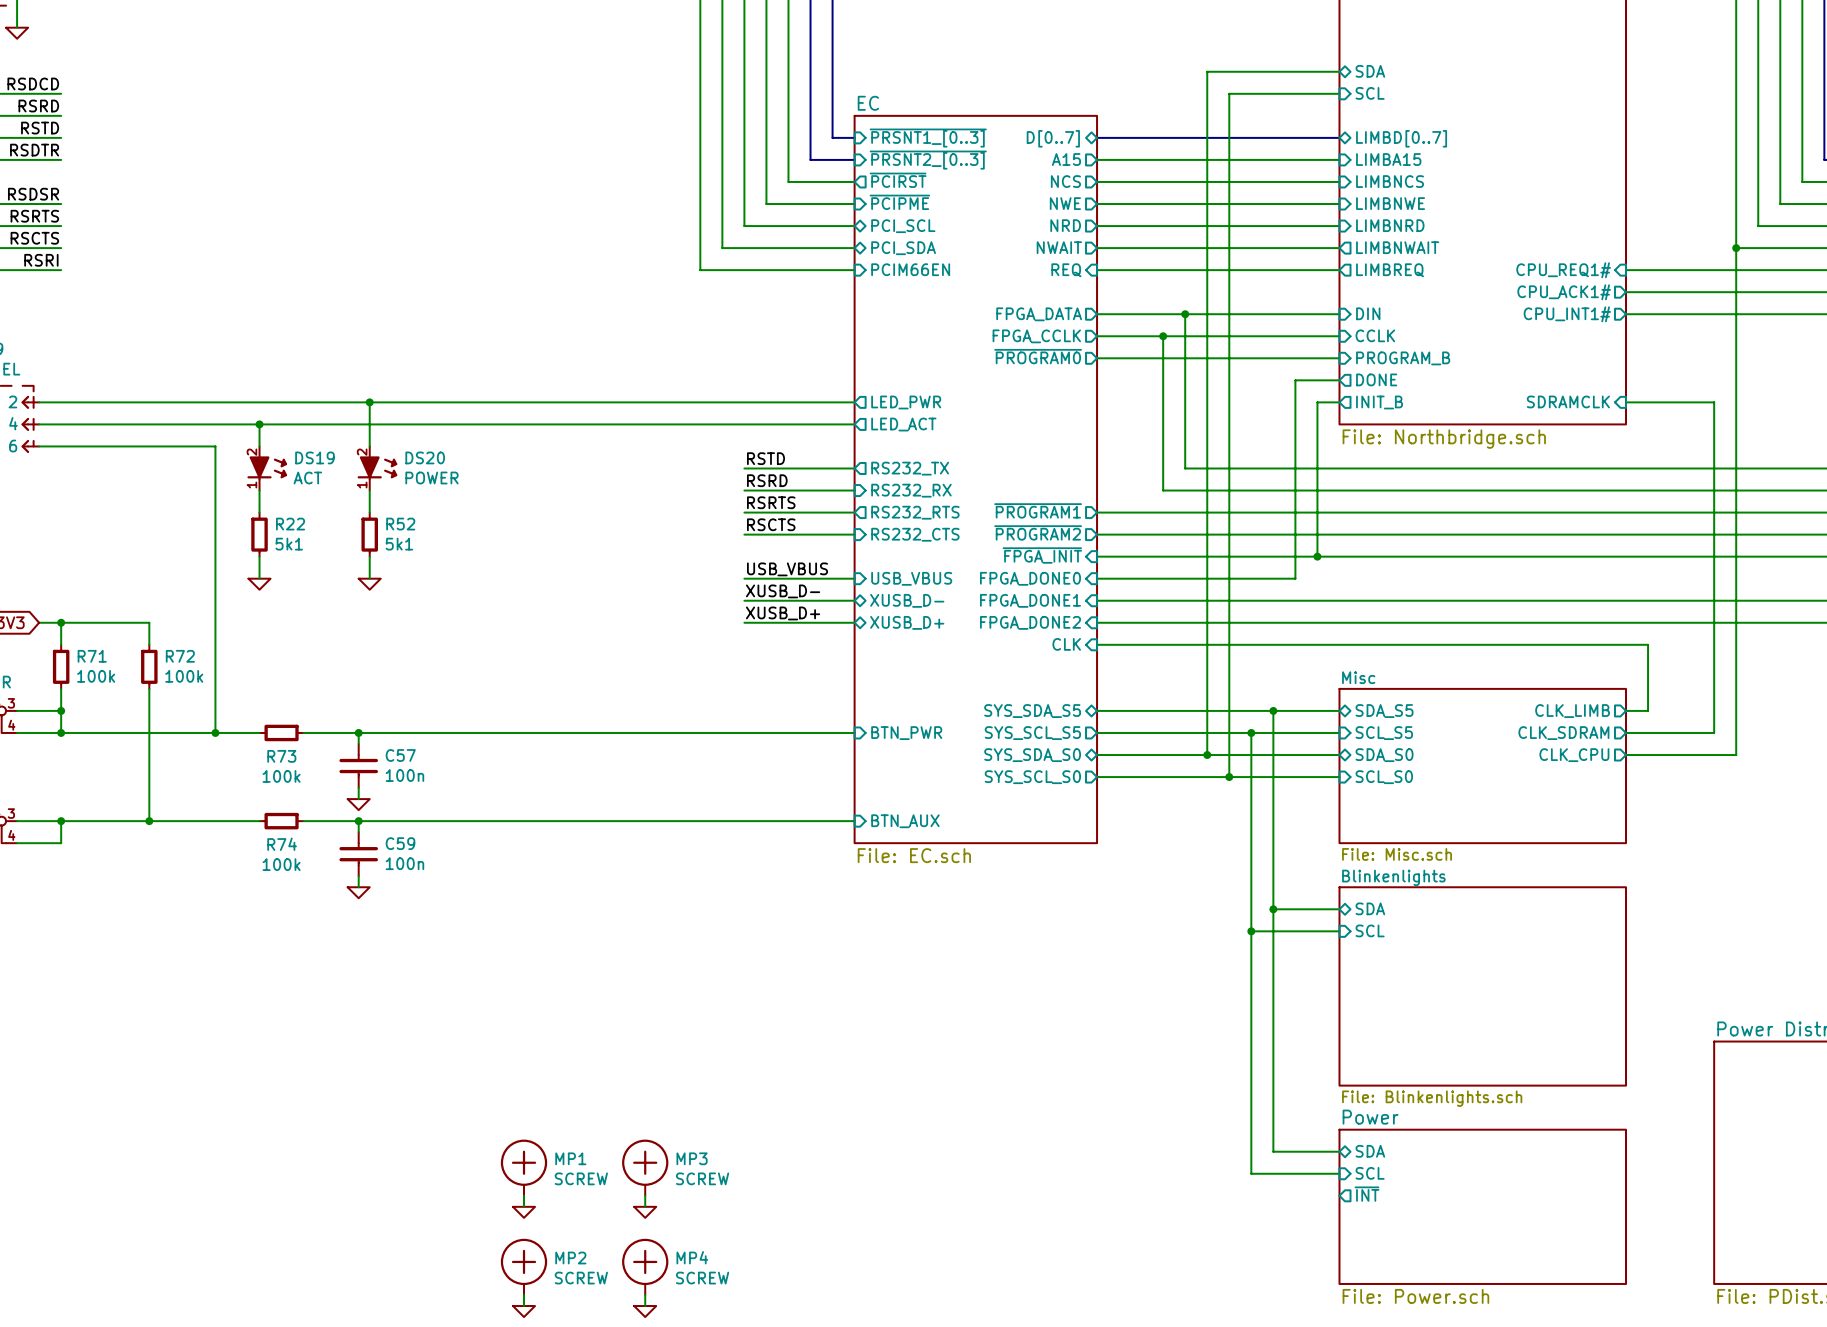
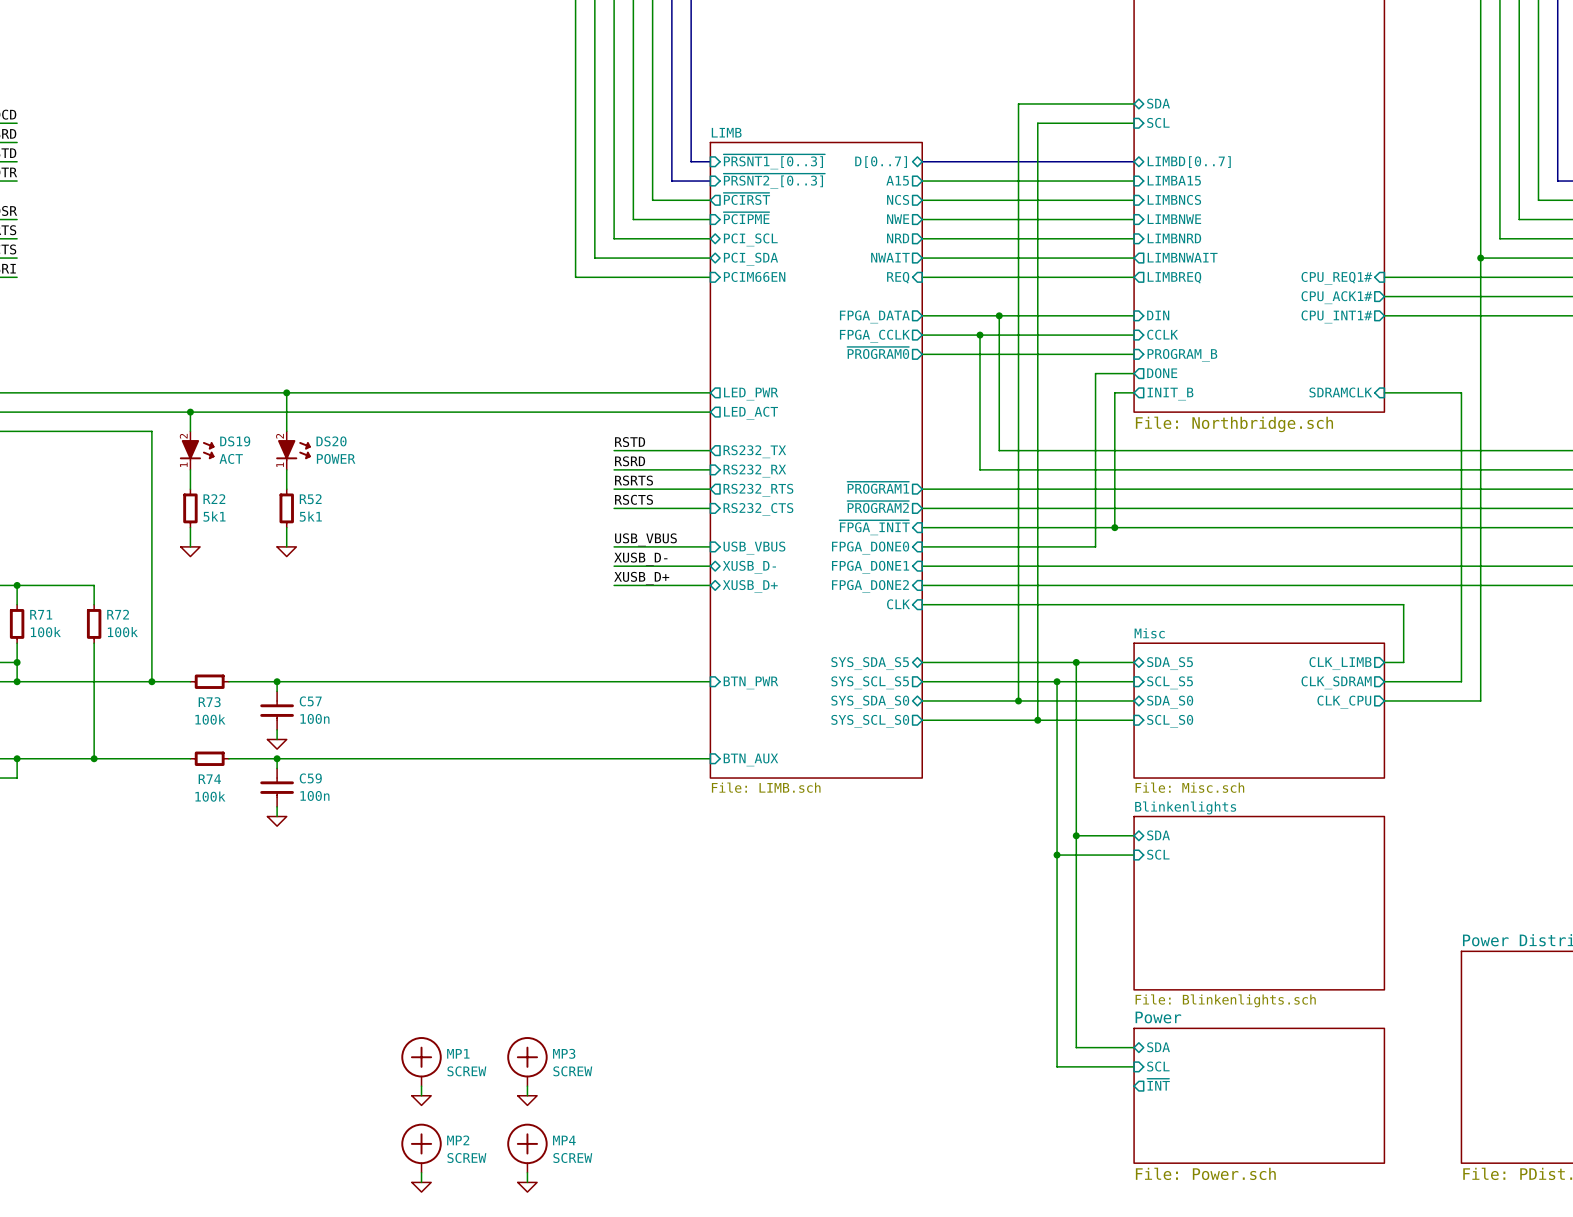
sheet EC name: EC (868, 103) -> LIMB (726, 132)
sheet EC value: File: EC.sch (914, 855) -> File: LIMB.sch (766, 787)

